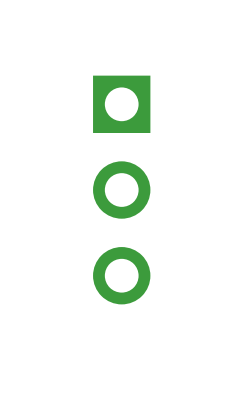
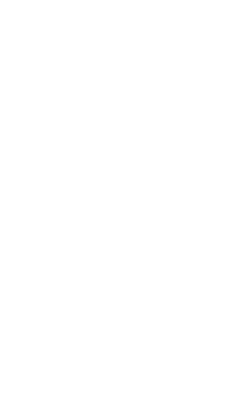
part: (121, 190) -> none

